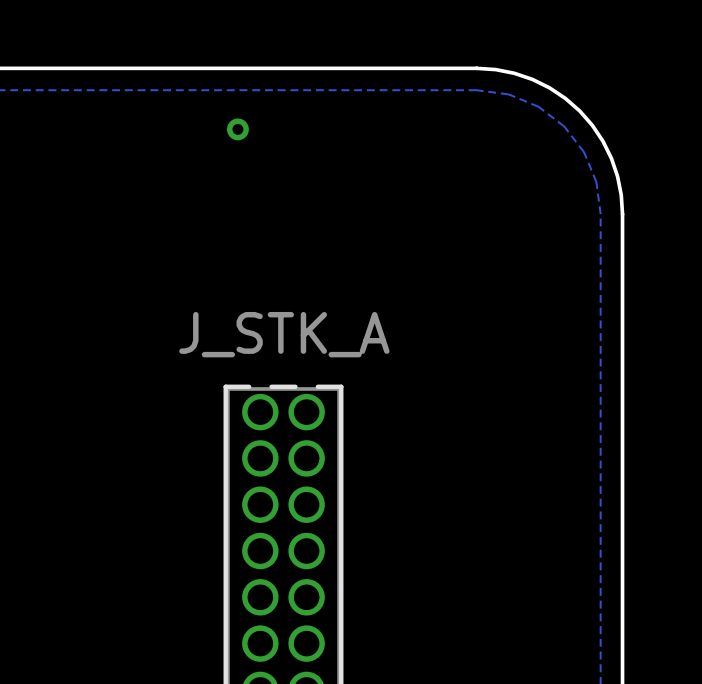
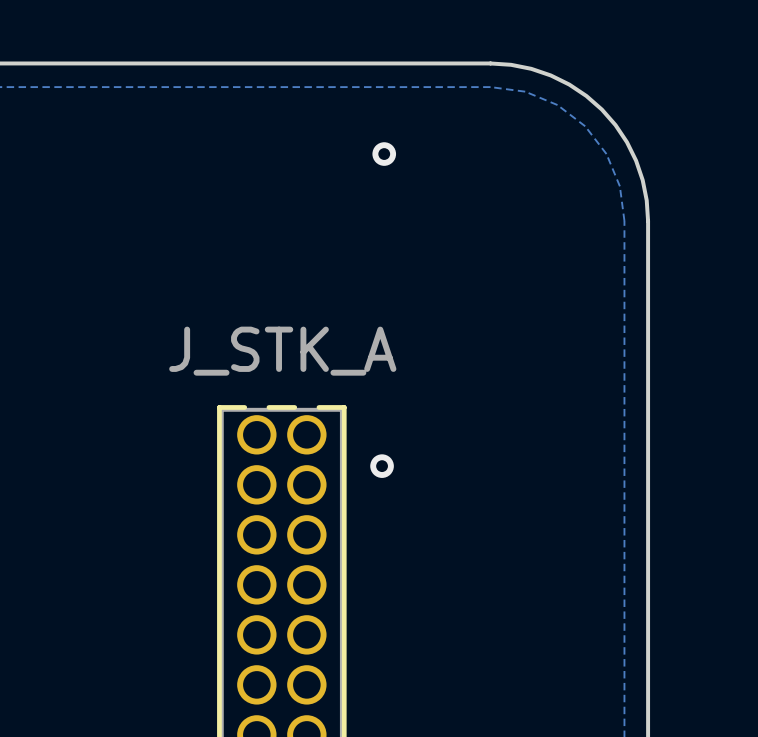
via position: (237, 129) -> (384, 154)
via: none -> (382, 466)

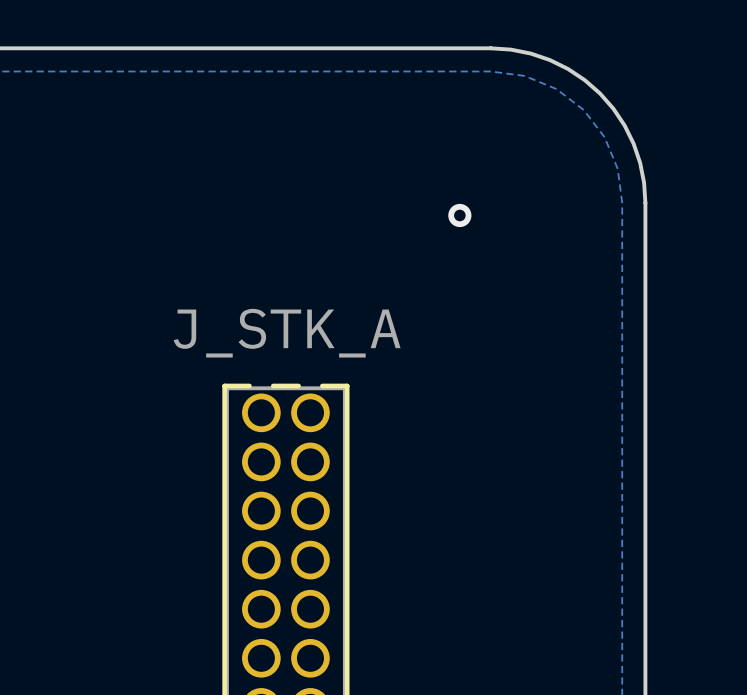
via position: (384, 154) -> (459, 215)
via: (382, 466) -> none

